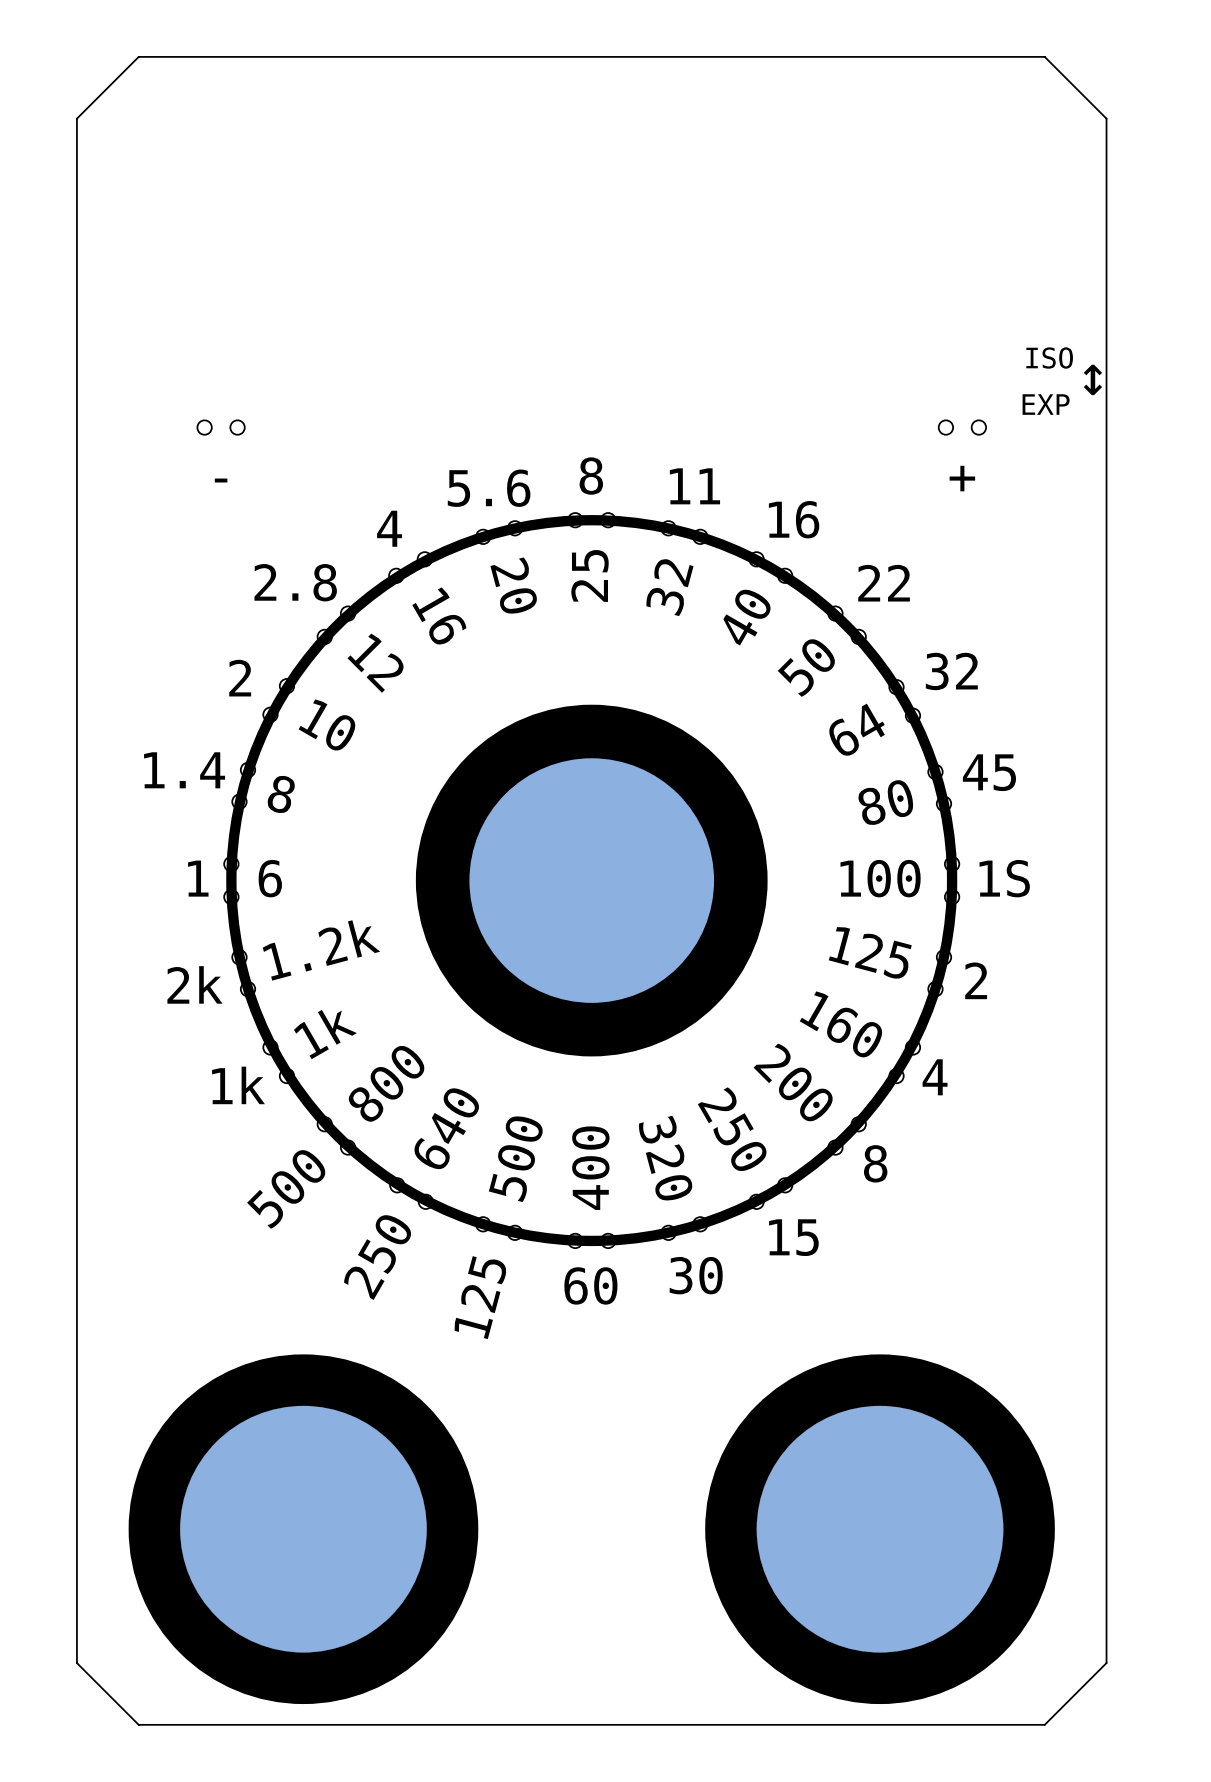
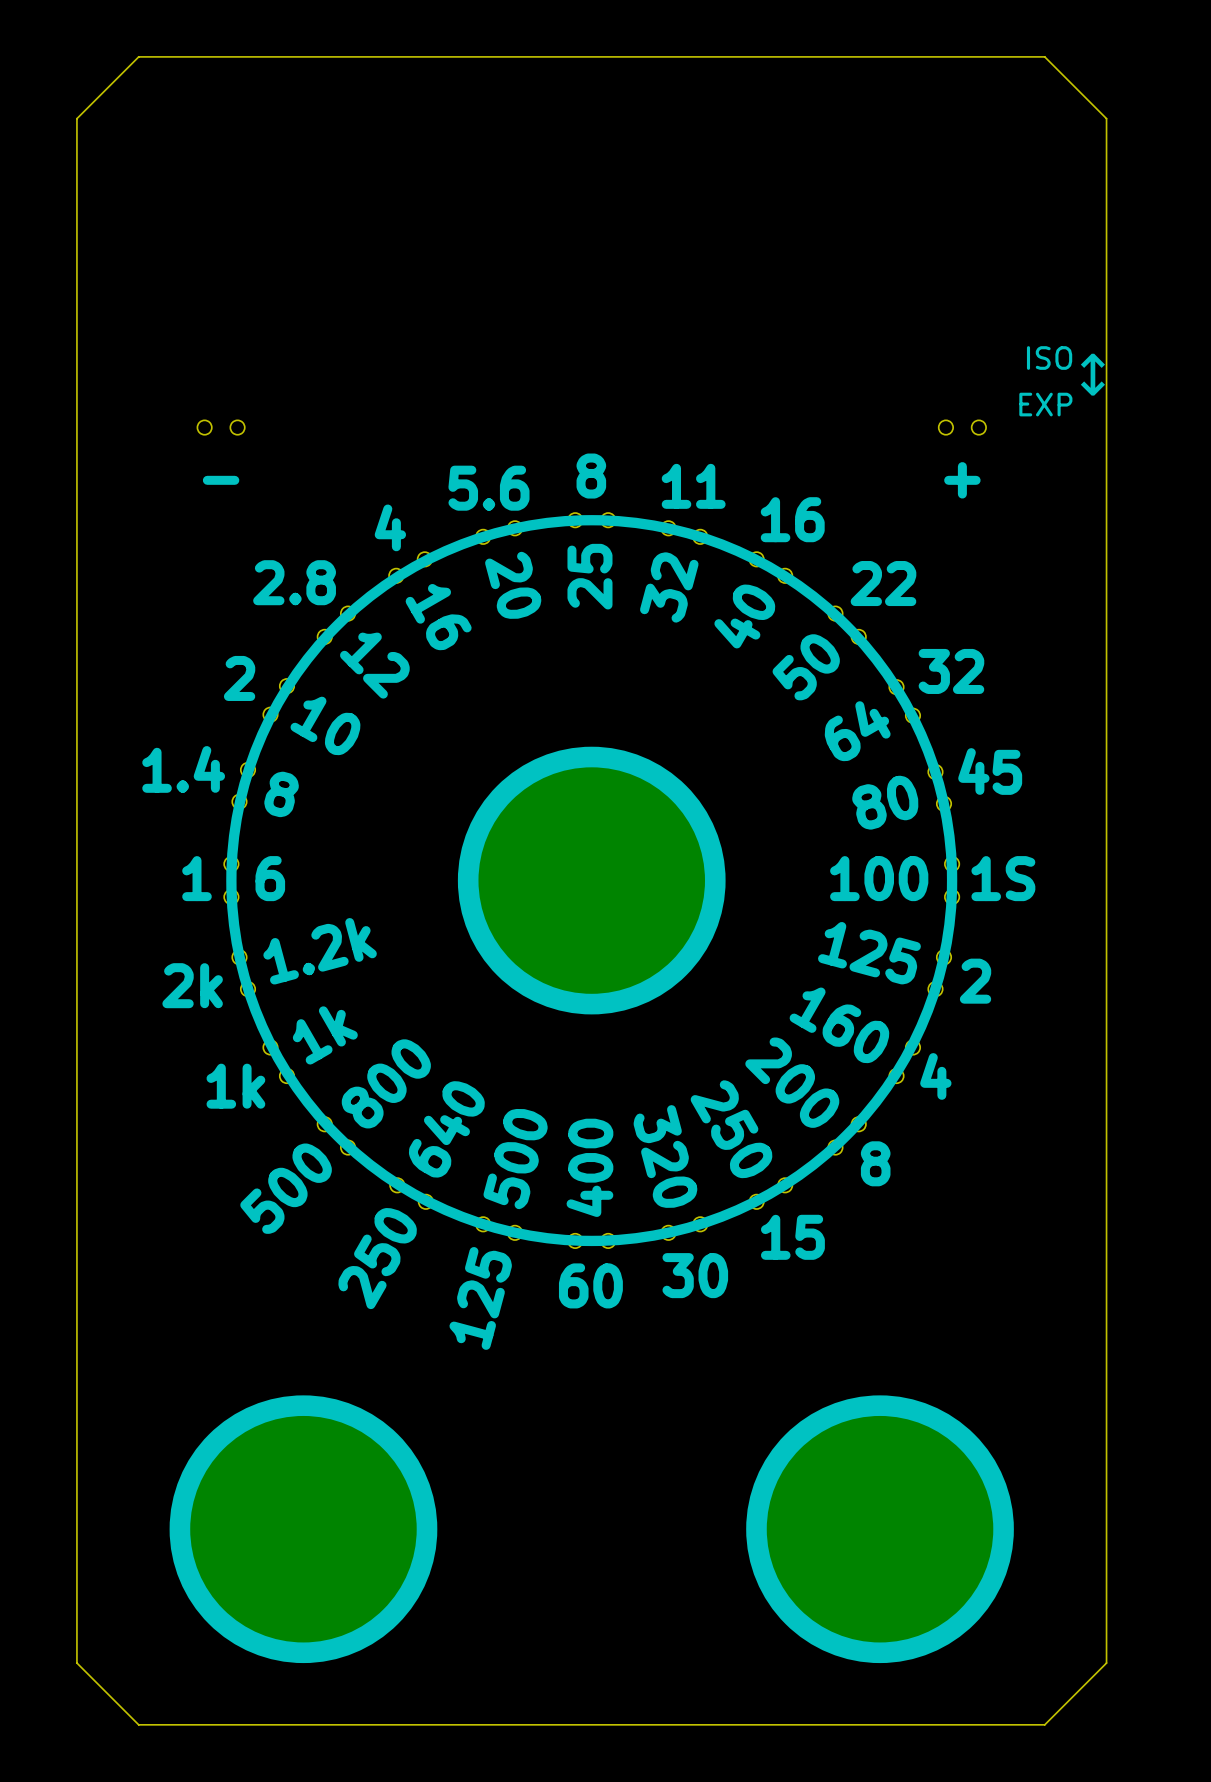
drawing shape: [415, 704, 768, 1057] -> [457, 746, 726, 1015]
drawing shape: [128, 1354, 479, 1705] -> [169, 1395, 438, 1664]
drawing shape: [705, 1354, 1055, 1705] -> [746, 1395, 1014, 1664]

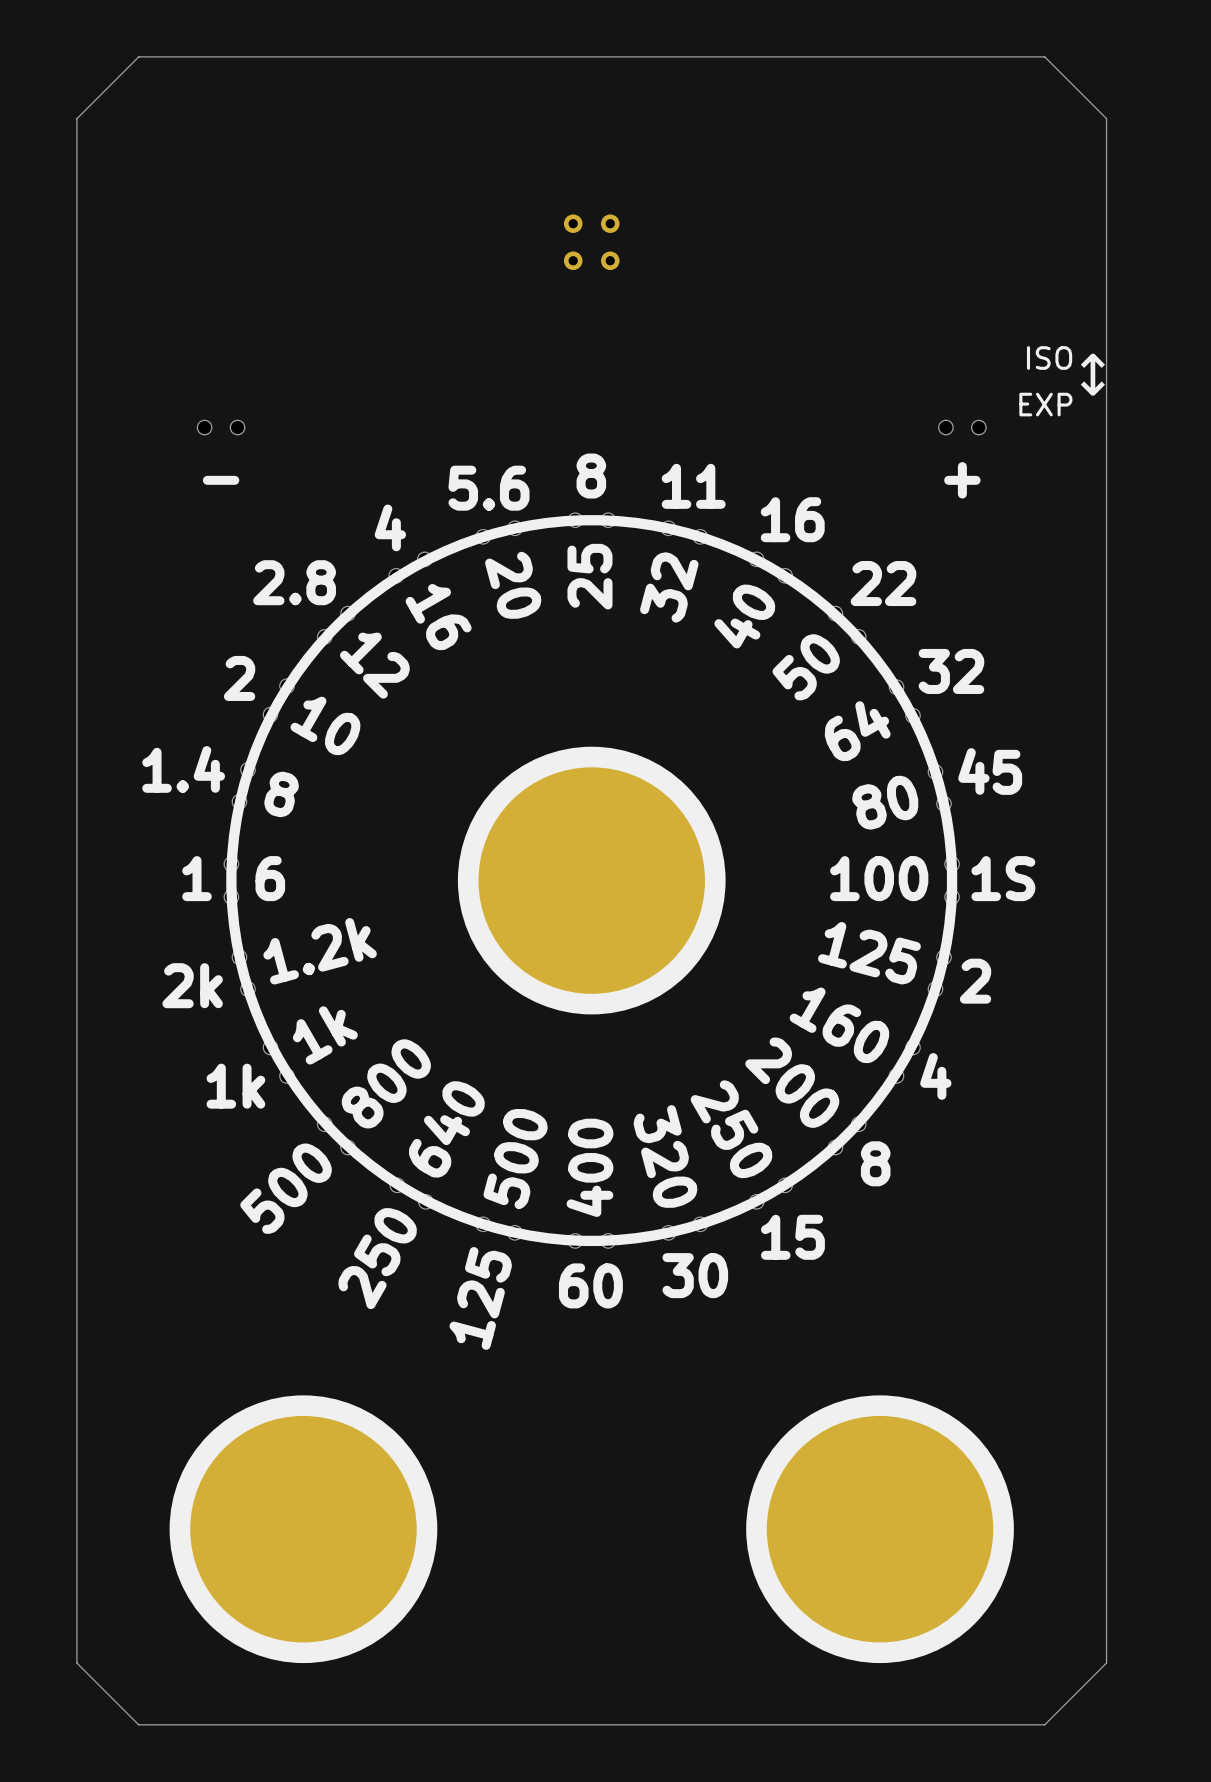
part: none -> (591, 242)

